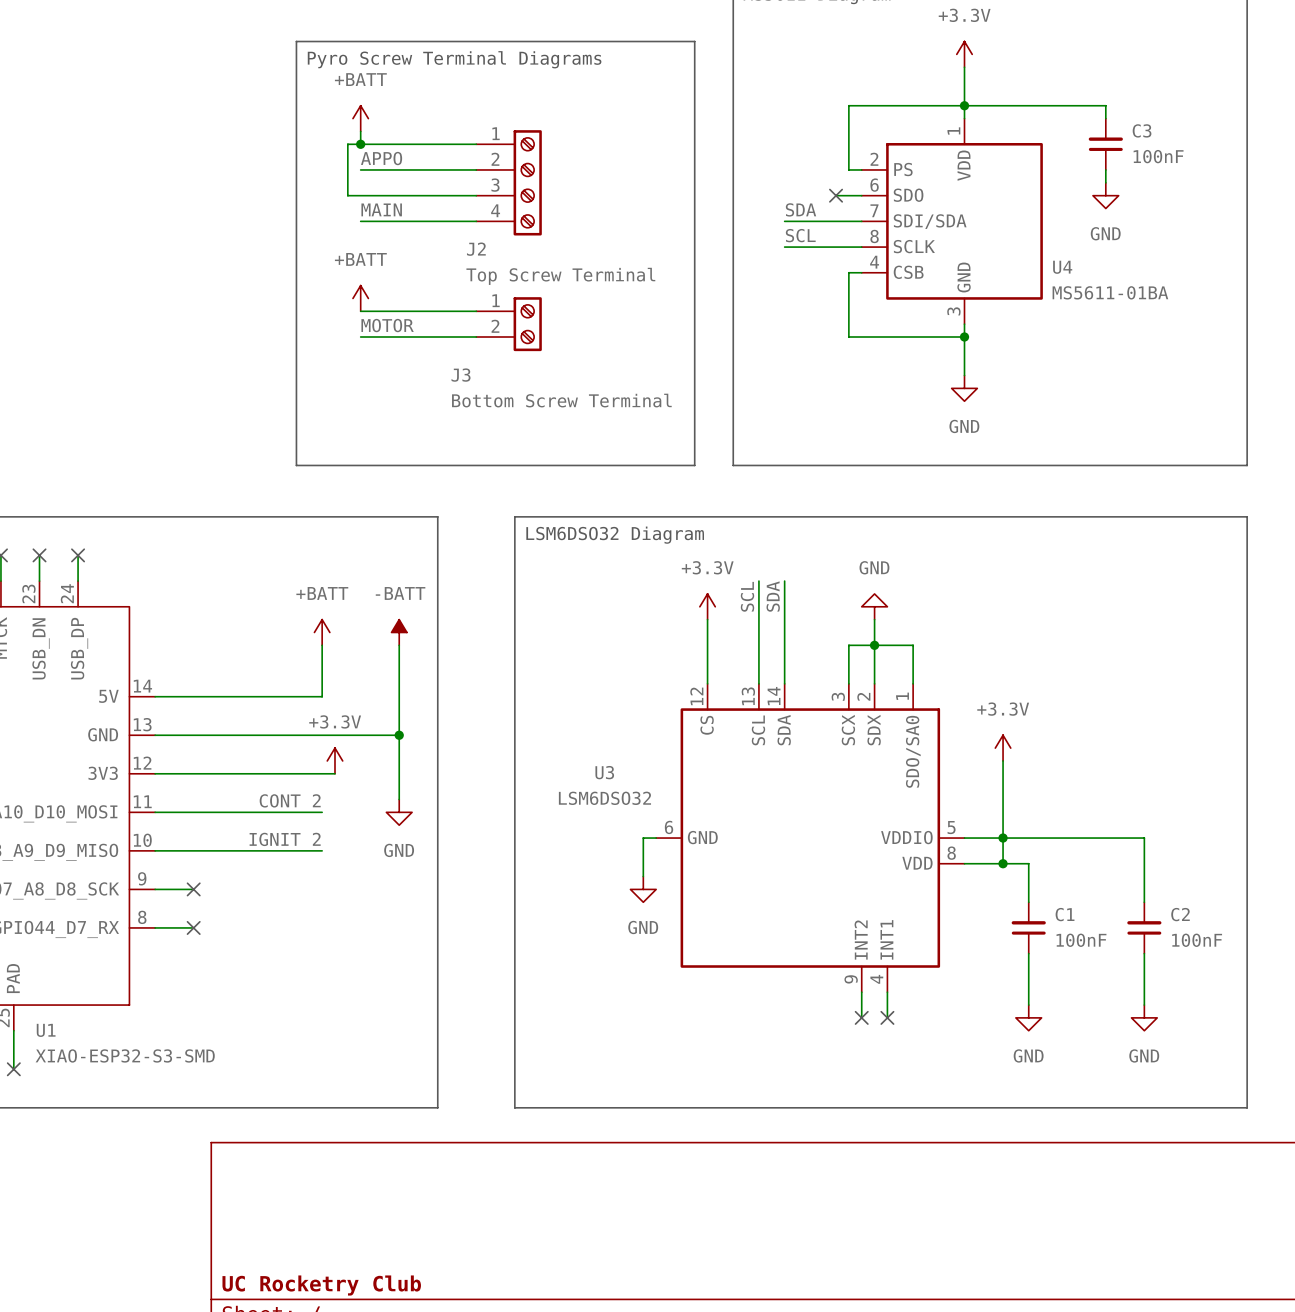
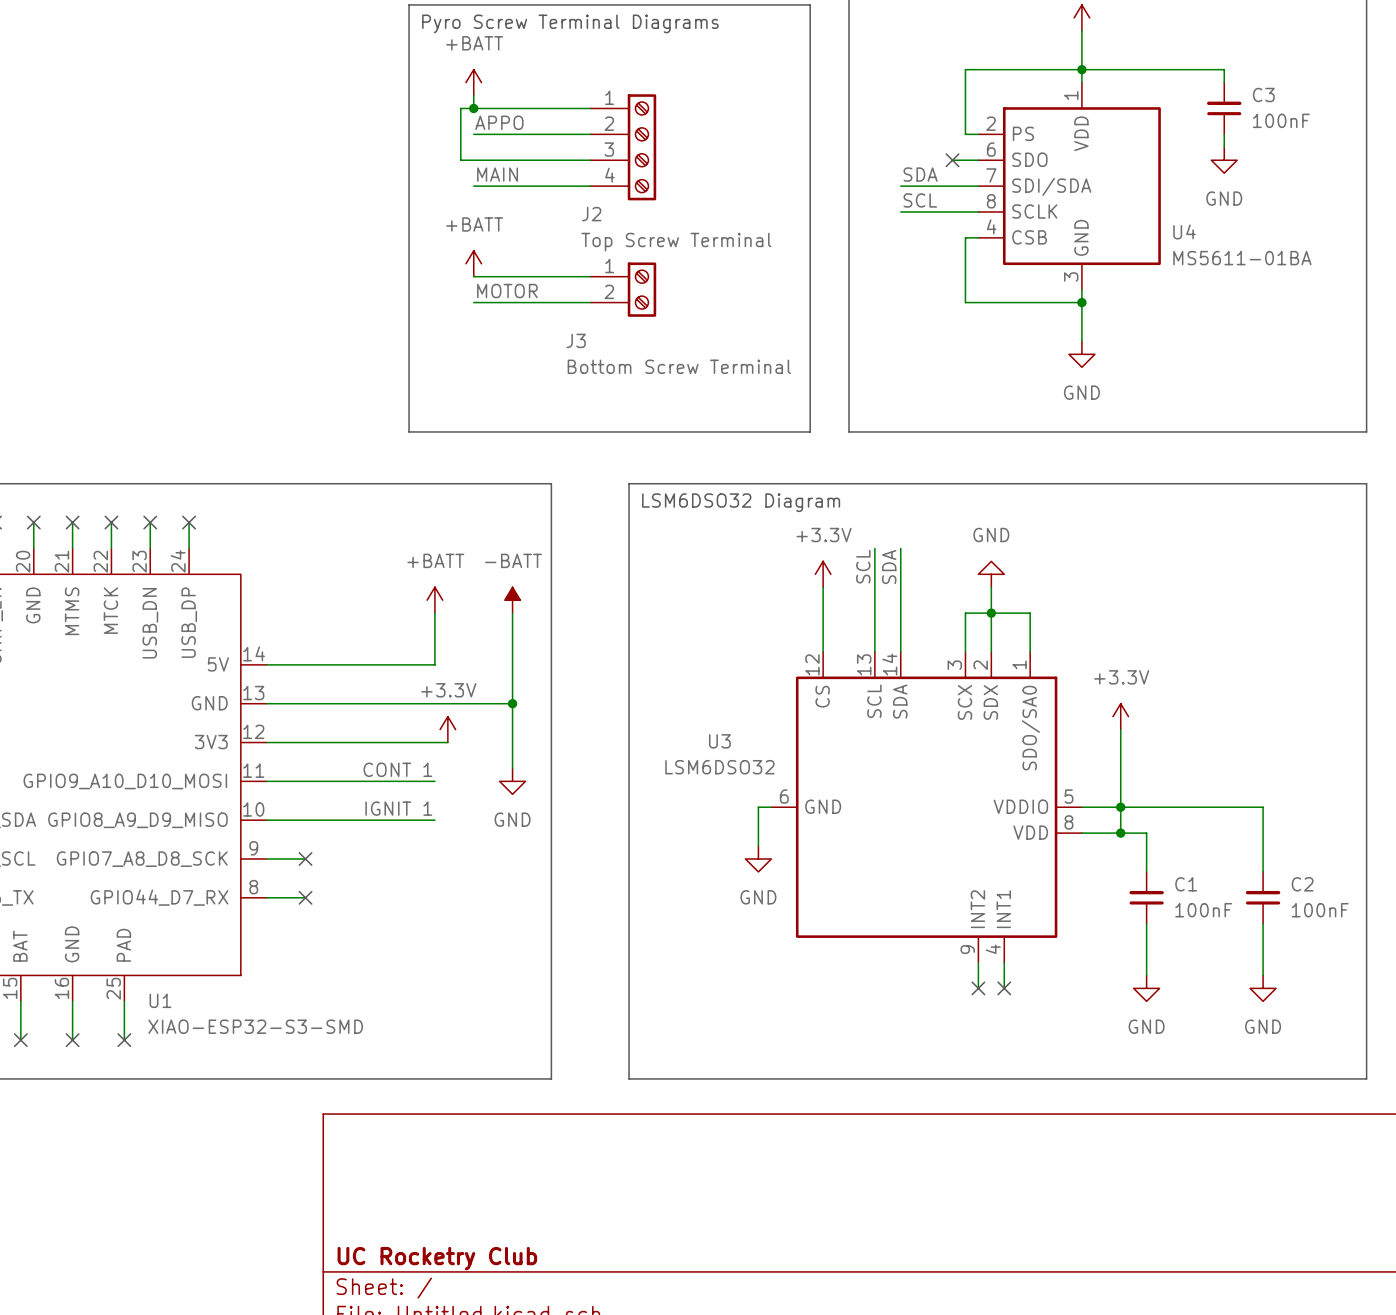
label: CONT 2 (290, 800) -> CONT 1 (397, 769)
label: IGNIT 2 (285, 839) -> IGNIT 1 (398, 808)

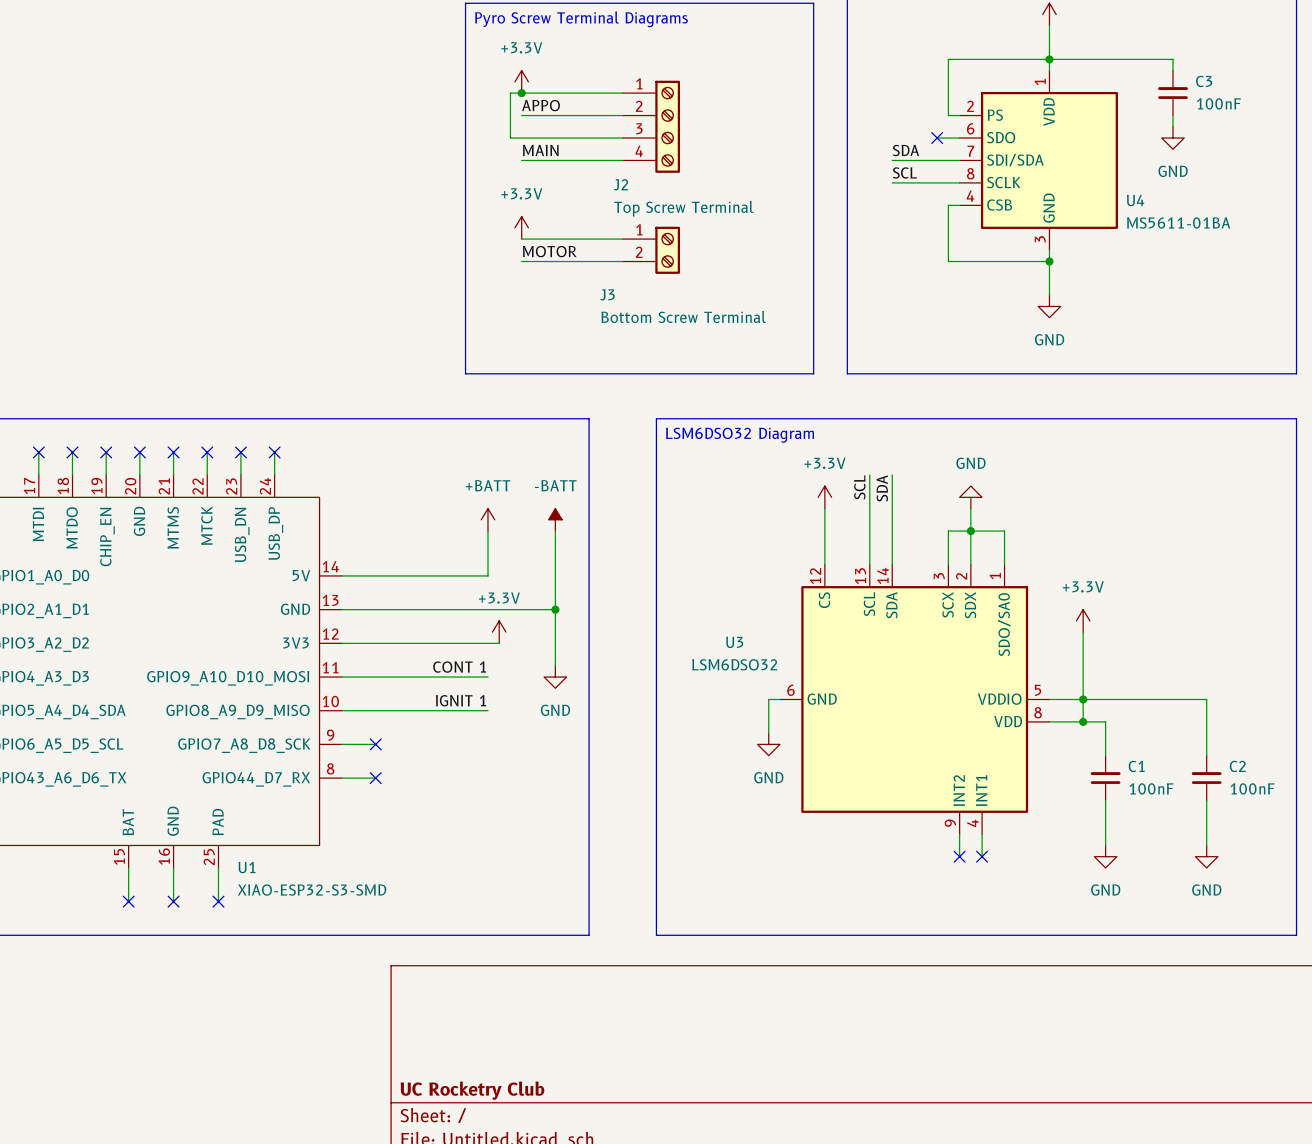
power symbol: +BATT (473, 82) -> none
power symbol: none -> +3.3V (521, 81)
power symbol: +BATT (473, 263) -> +3.3V (521, 227)

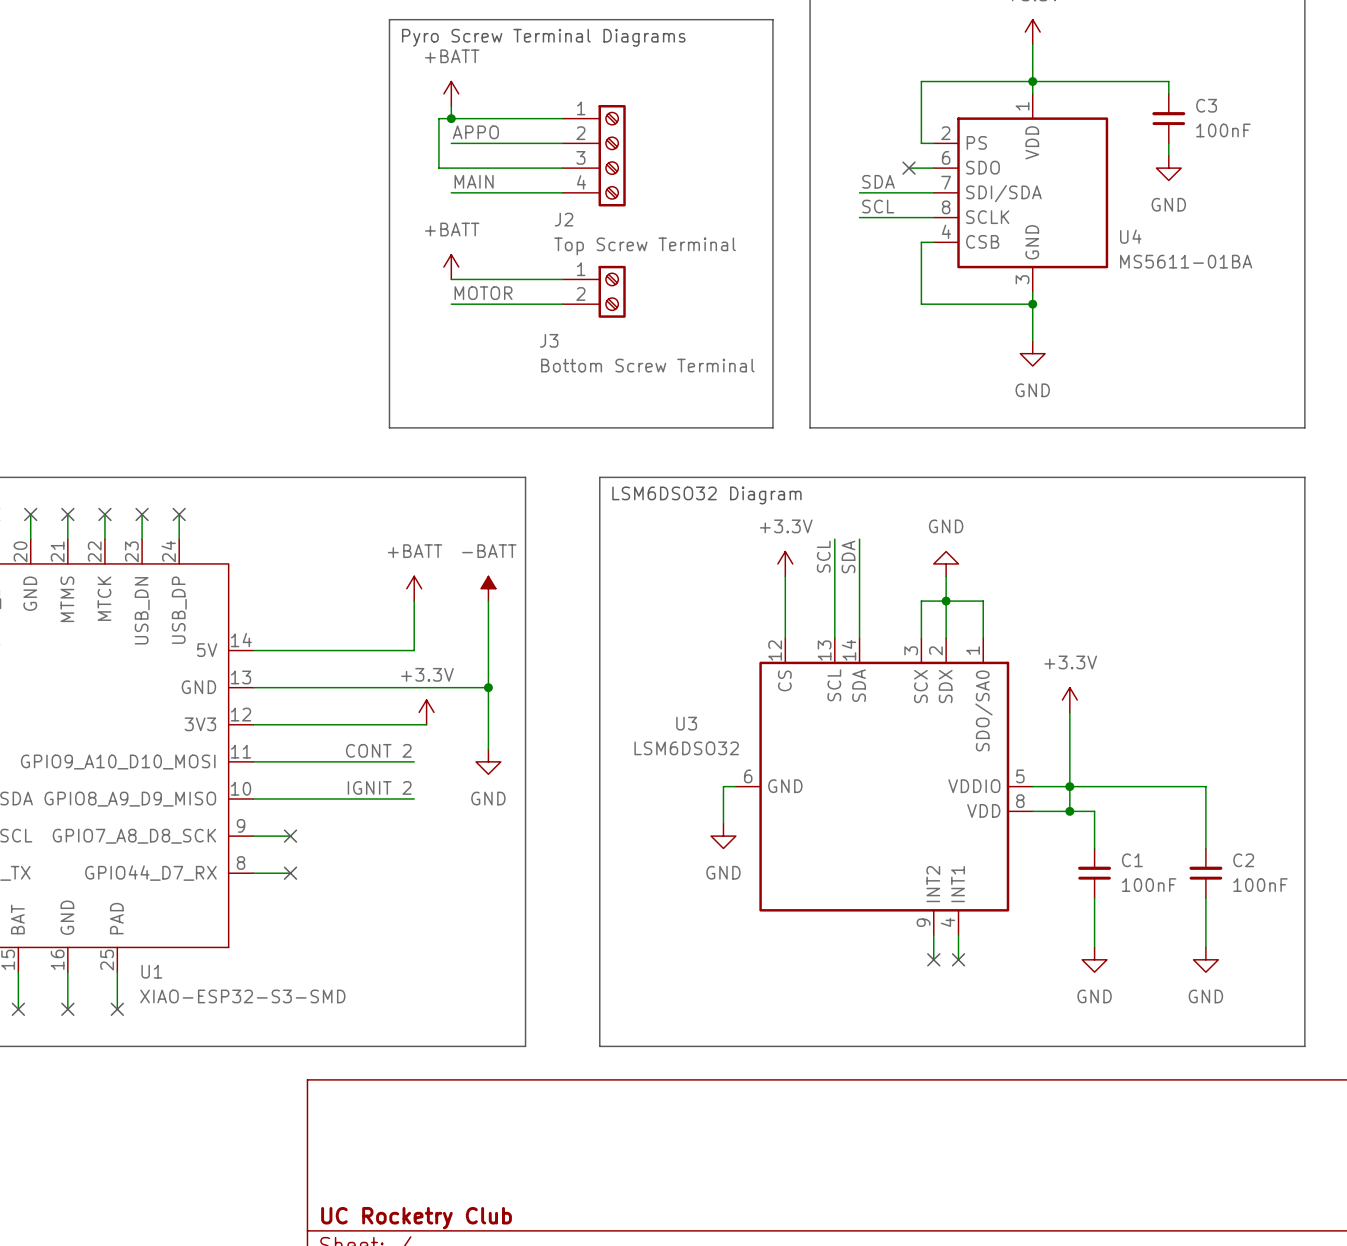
power symbol: none -> +BATT (451, 93)
power symbol: +3.3V (521, 81) -> none
power symbol: +3.3V (521, 227) -> +BATT (451, 267)
label: CONT 1 (459, 667) -> CONT 2 (378, 750)
label: IGNIT 1 (461, 700) -> IGNIT 2 (379, 787)

